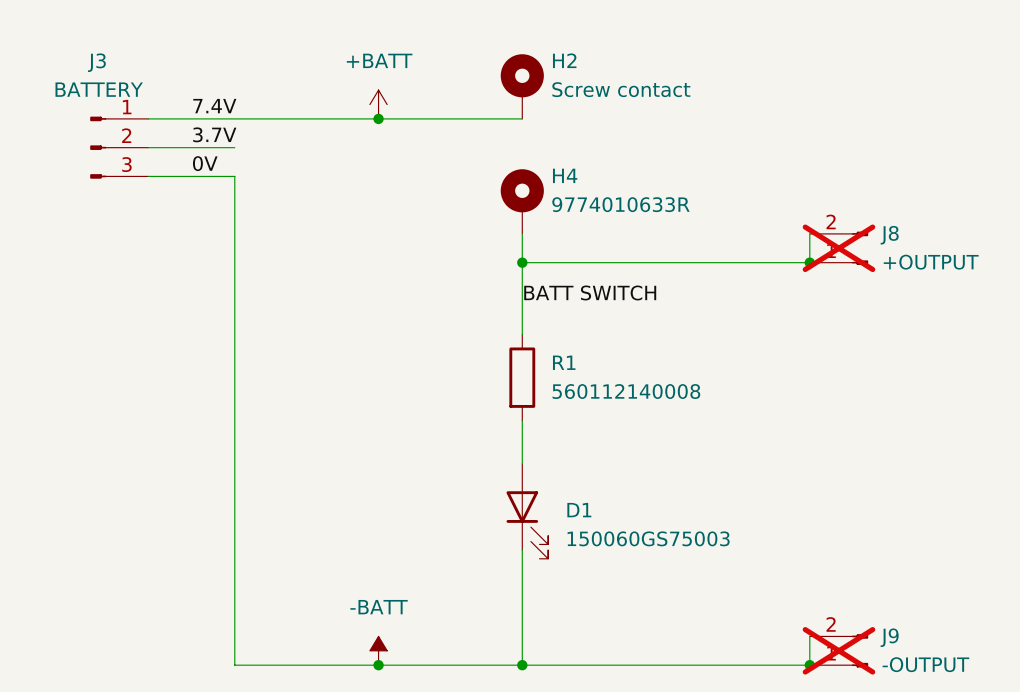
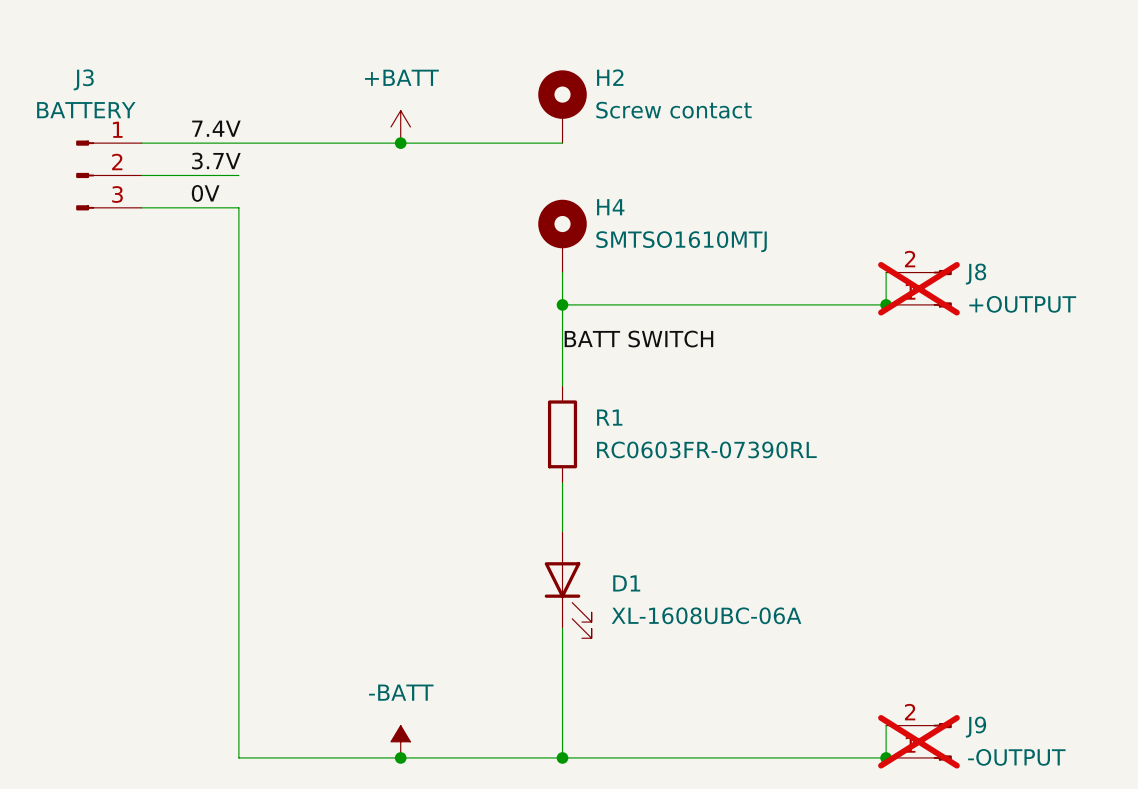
H4 value: 9774010633R (620, 204) -> SMTSO1610MTJ (681, 241)
R1 value: 560112140008 (626, 391) -> RC0603FR-07390RL (706, 449)
D1 value: 150060GS75003 (648, 538) -> XL-1608UBC-06A (706, 615)

